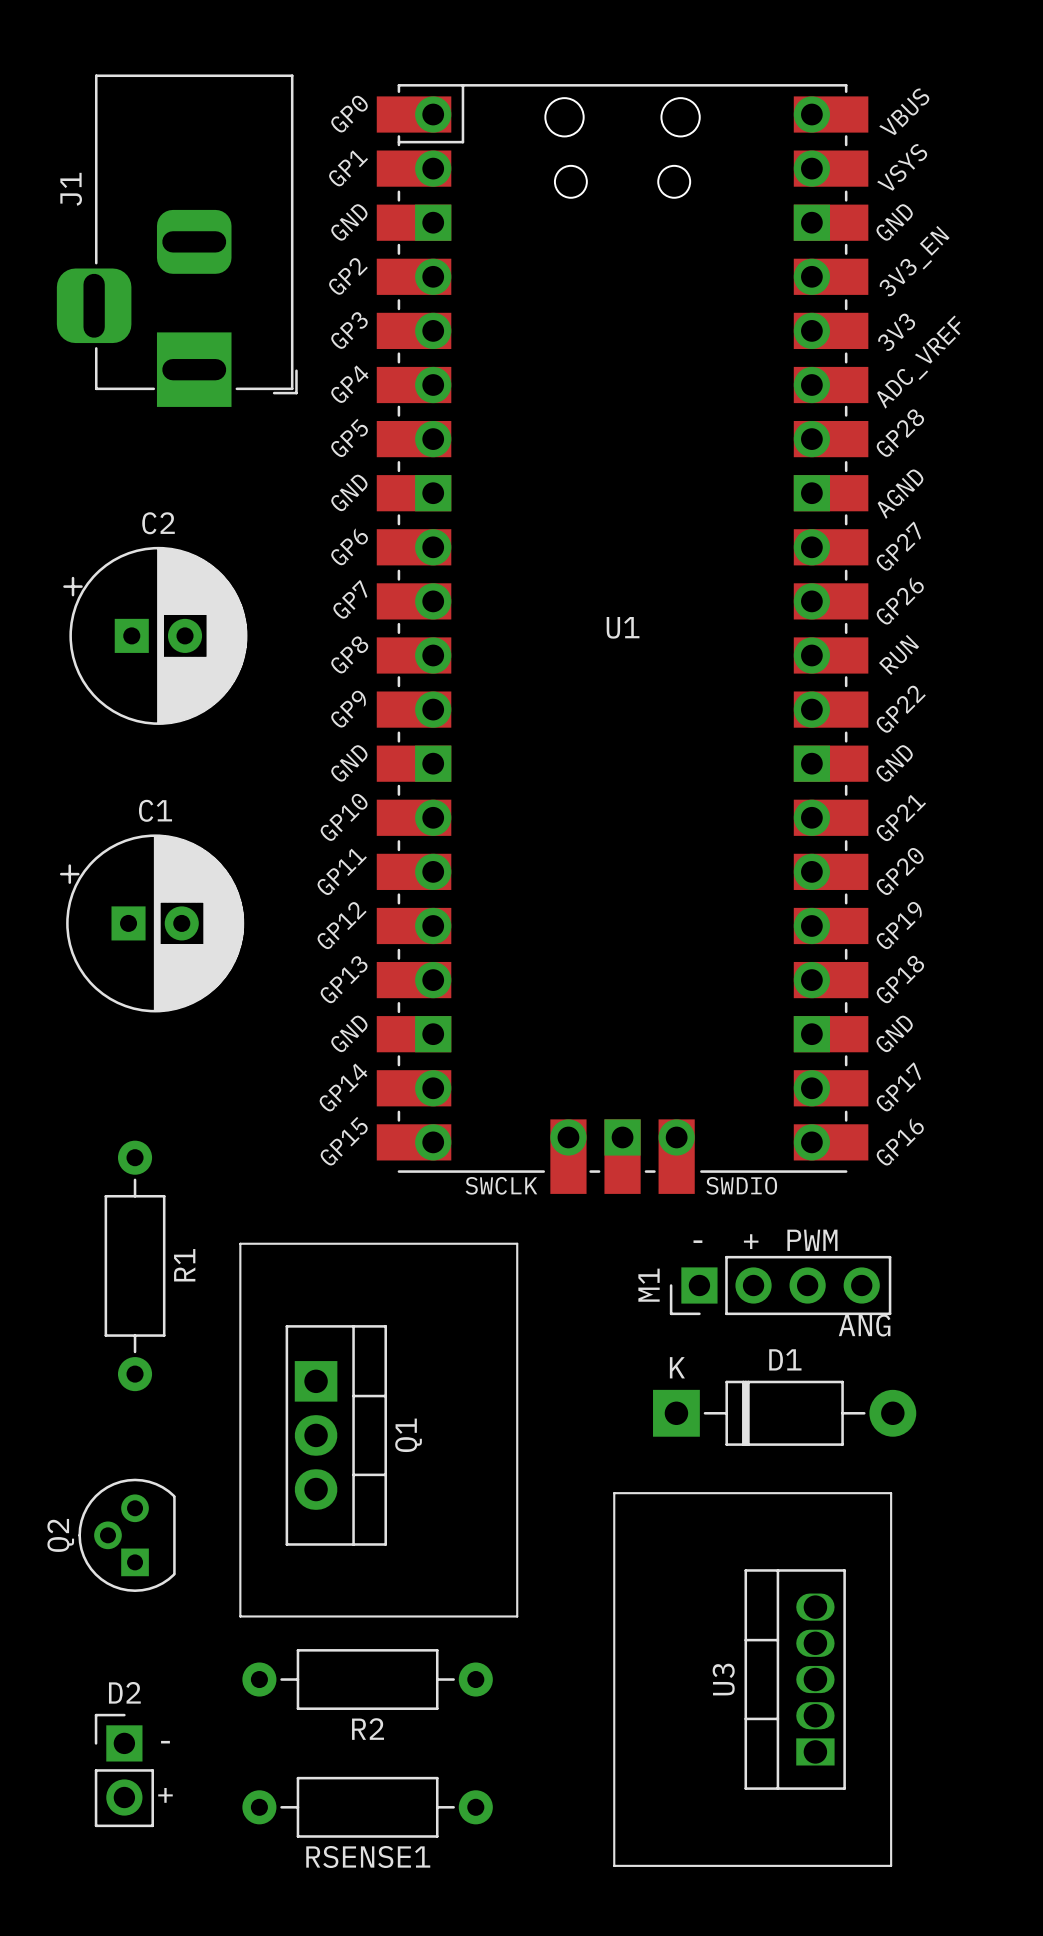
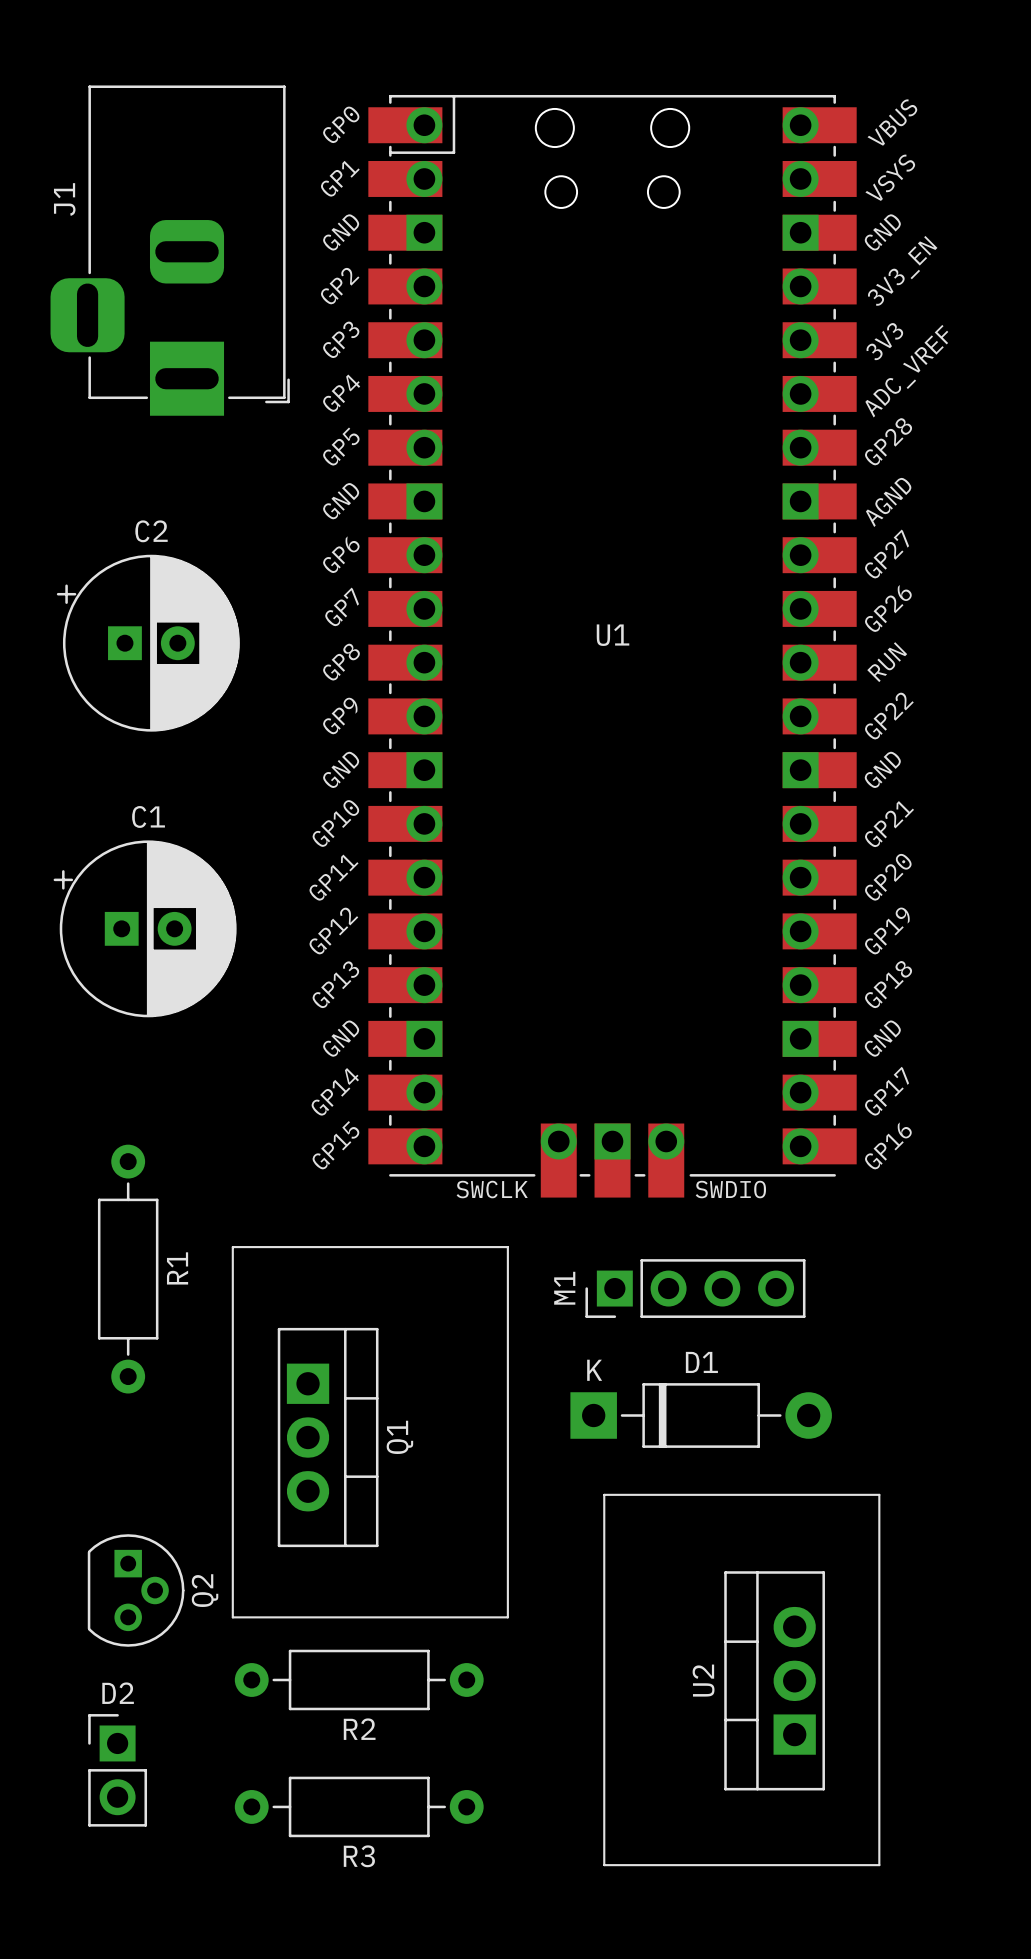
text: PWM (812, 1240) -> none
text: - (697, 1241) -> none
text: + (751, 1241) -> none
M1 position: (780, 1285) -> (695, 1288)
text: ANG (864, 1325) -> none
D1 position: (784, 1413) -> (701, 1415)
Q2 rotation: 0° (127, 1535) -> 180° (136, 1590)
U3: (795, 1679) -> none
U2: none -> (774, 1680)
text: - (165, 1742) -> none
text: + (165, 1795) -> none
RSENSE1 name: RSENSE1 (368, 1856) -> R3 (359, 1856)

